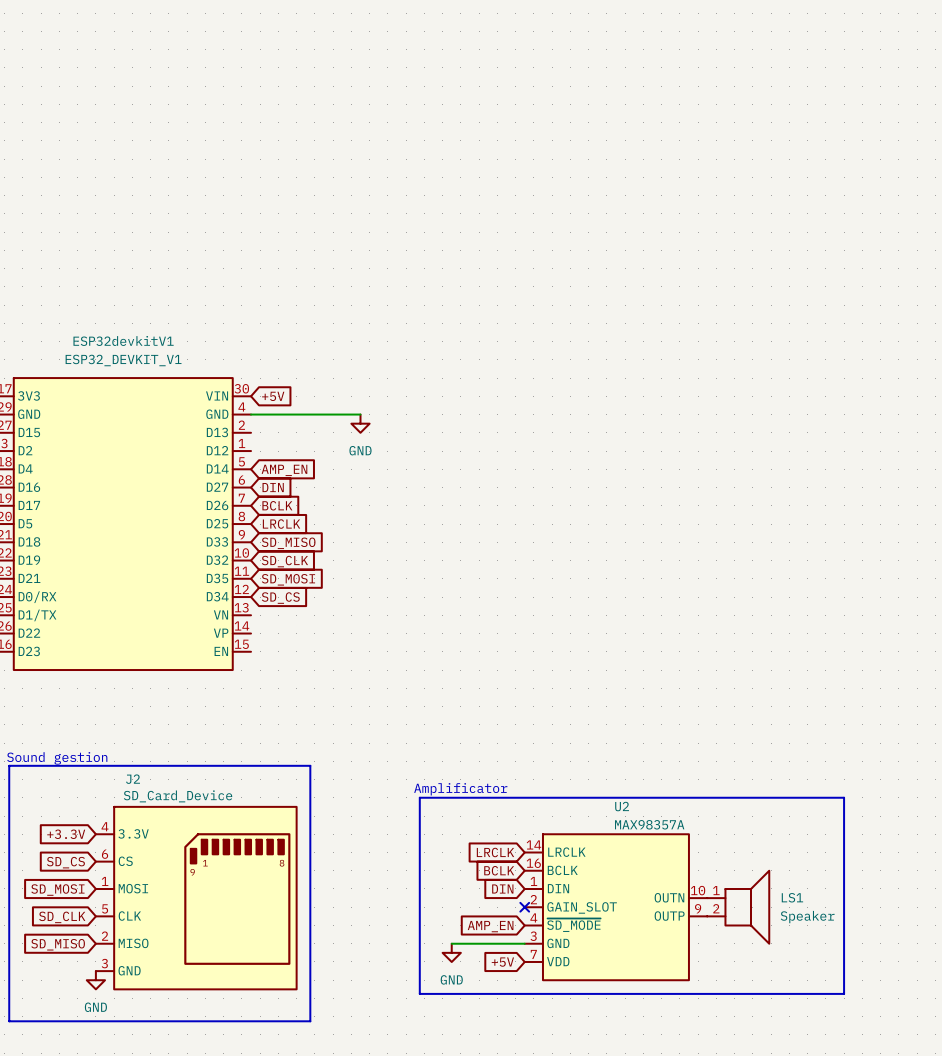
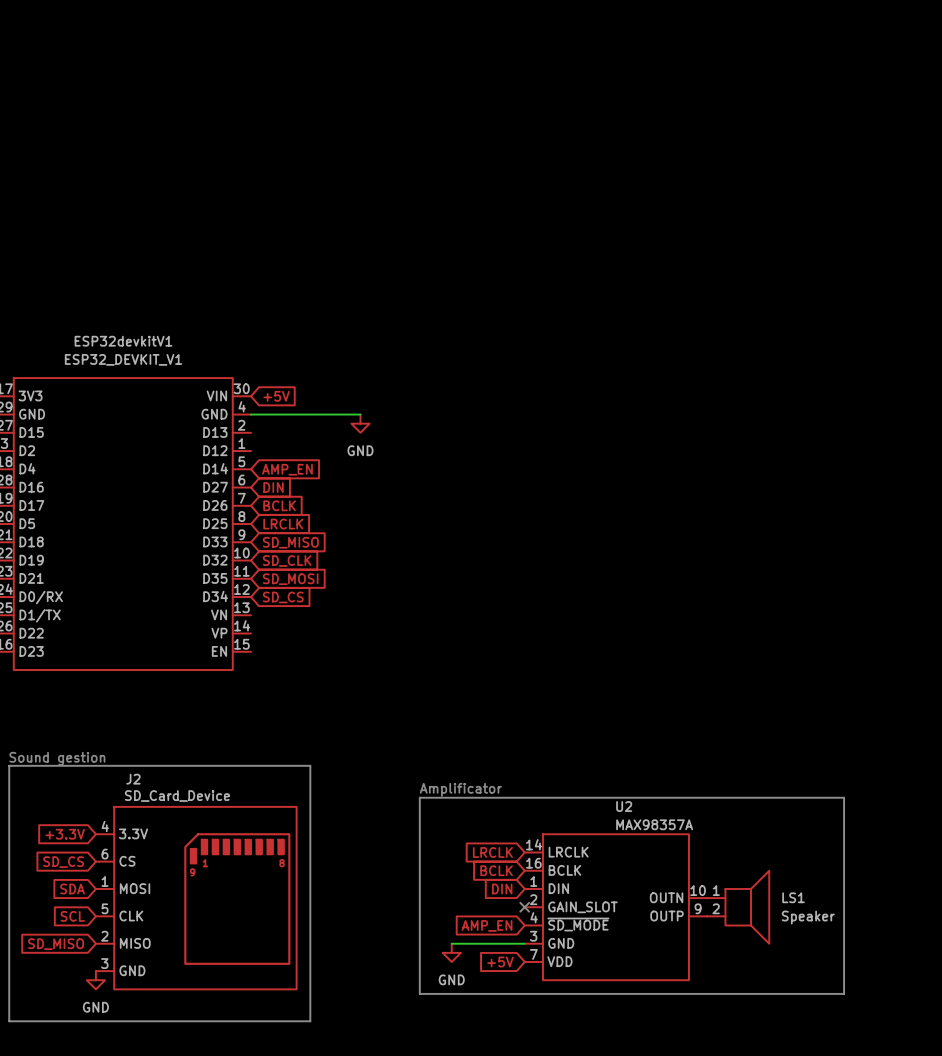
global label: SD_MOSI (57, 890) -> SDA (72, 888)
global label: SD_CLK (62, 917) -> SCL (72, 916)

